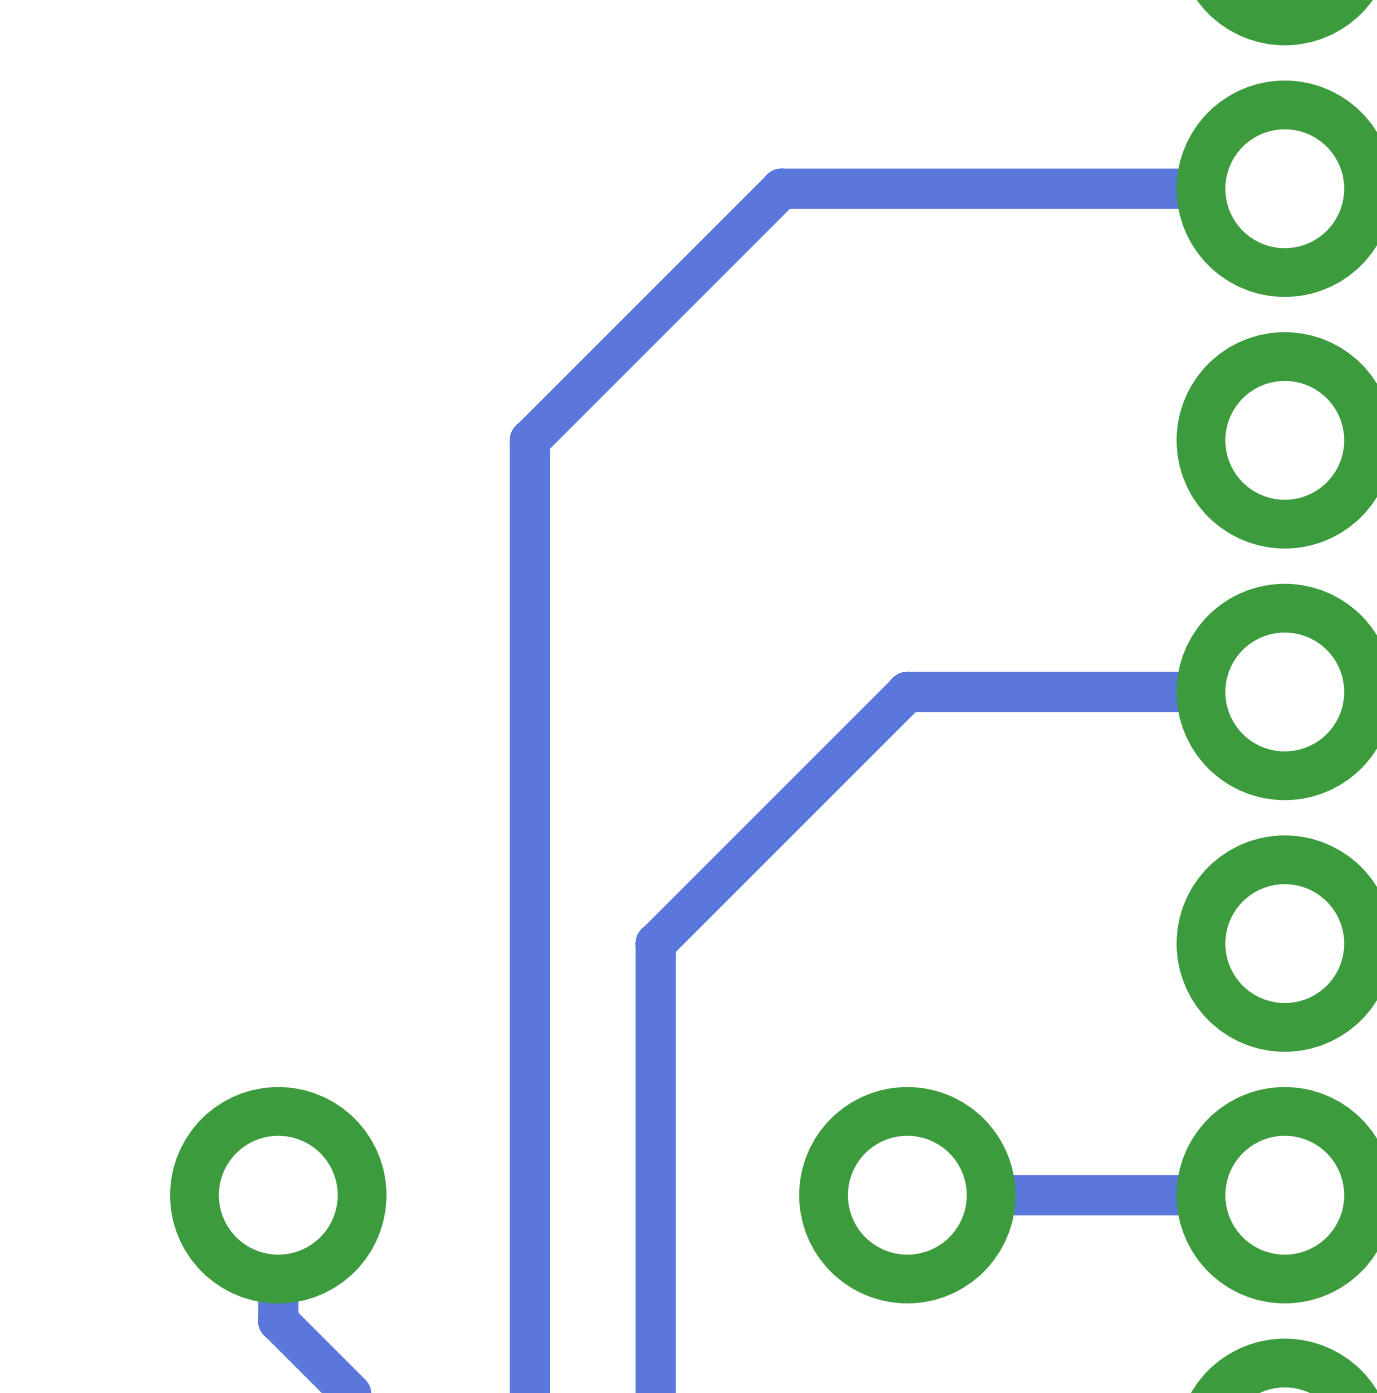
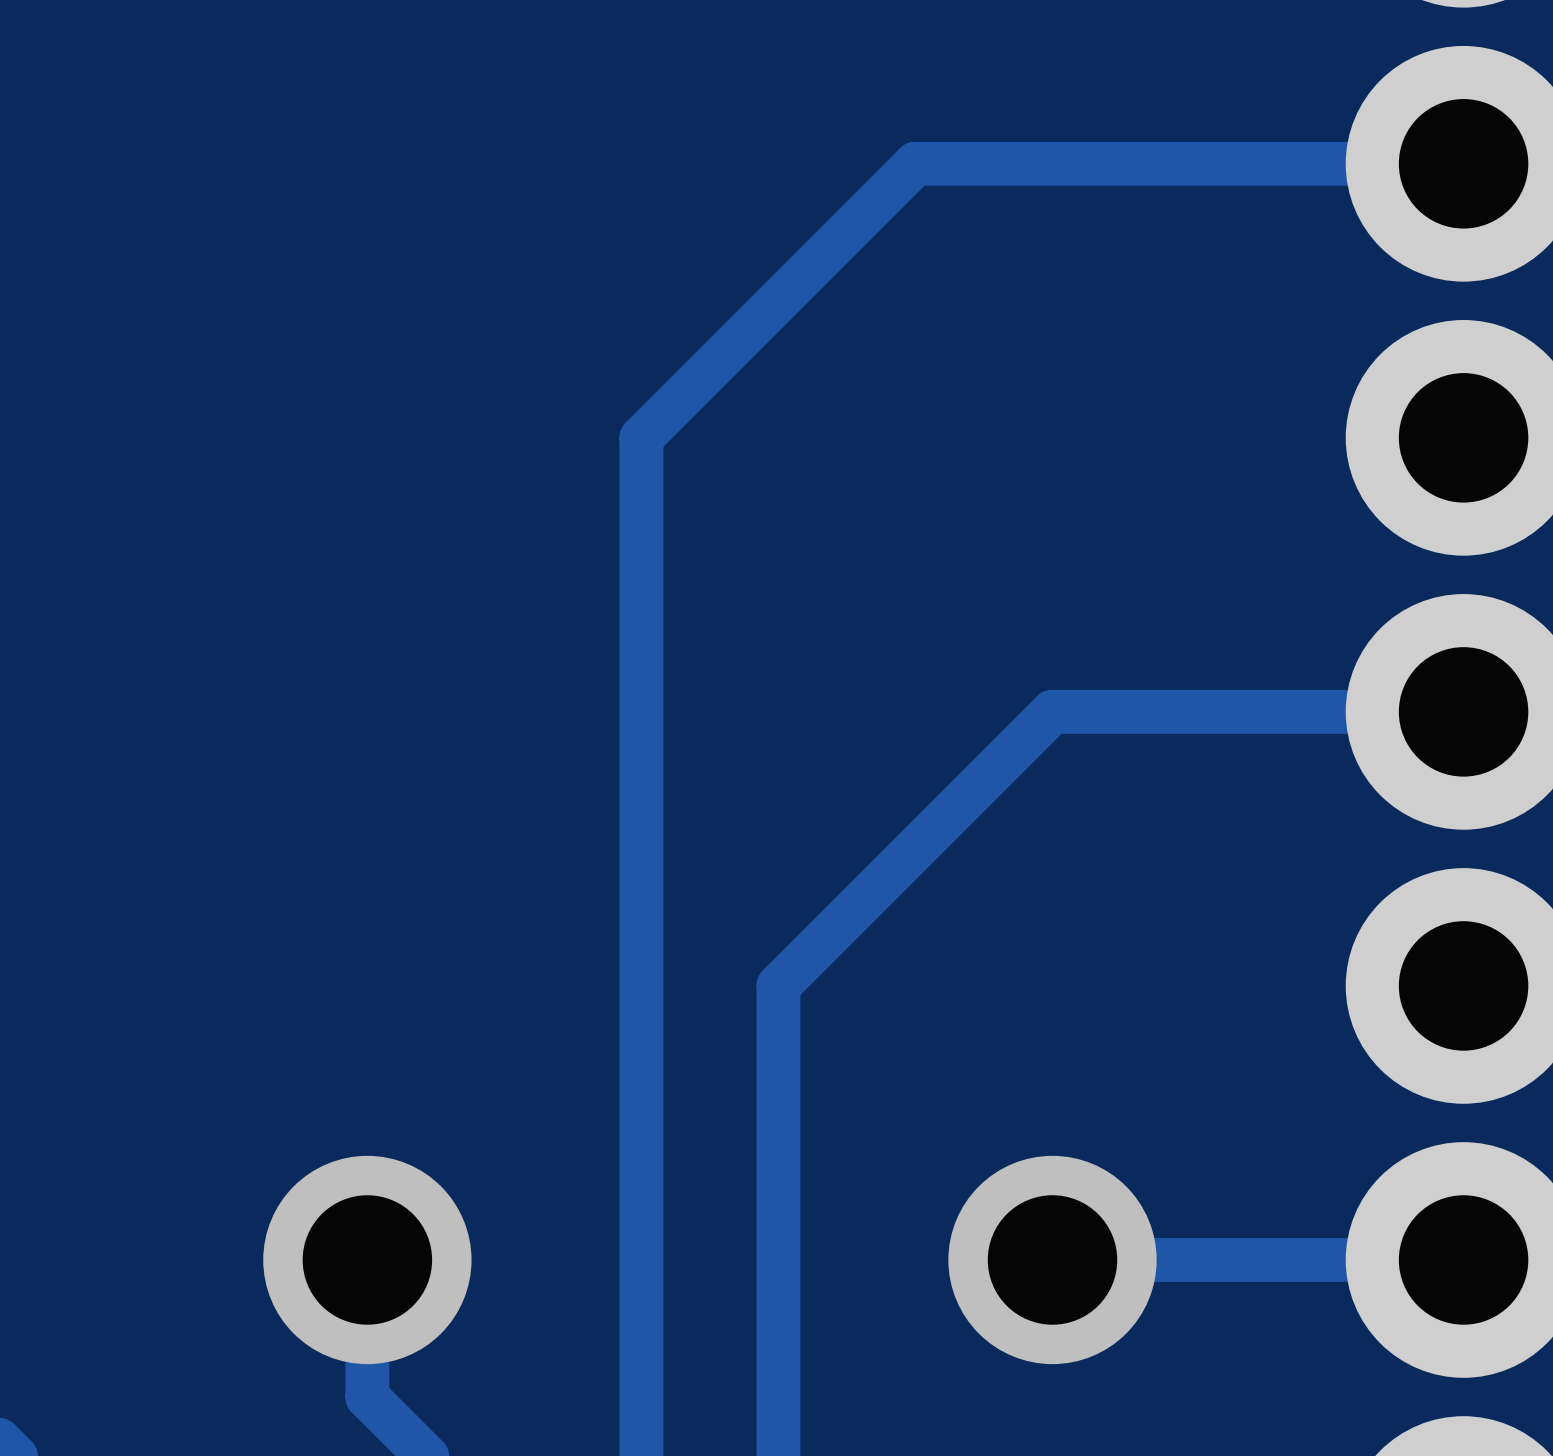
via size: [170, 1087, 387, 1304] -> [263, 1155, 472, 1365]
via size: [799, 1087, 1016, 1304] -> [948, 1155, 1157, 1365]

